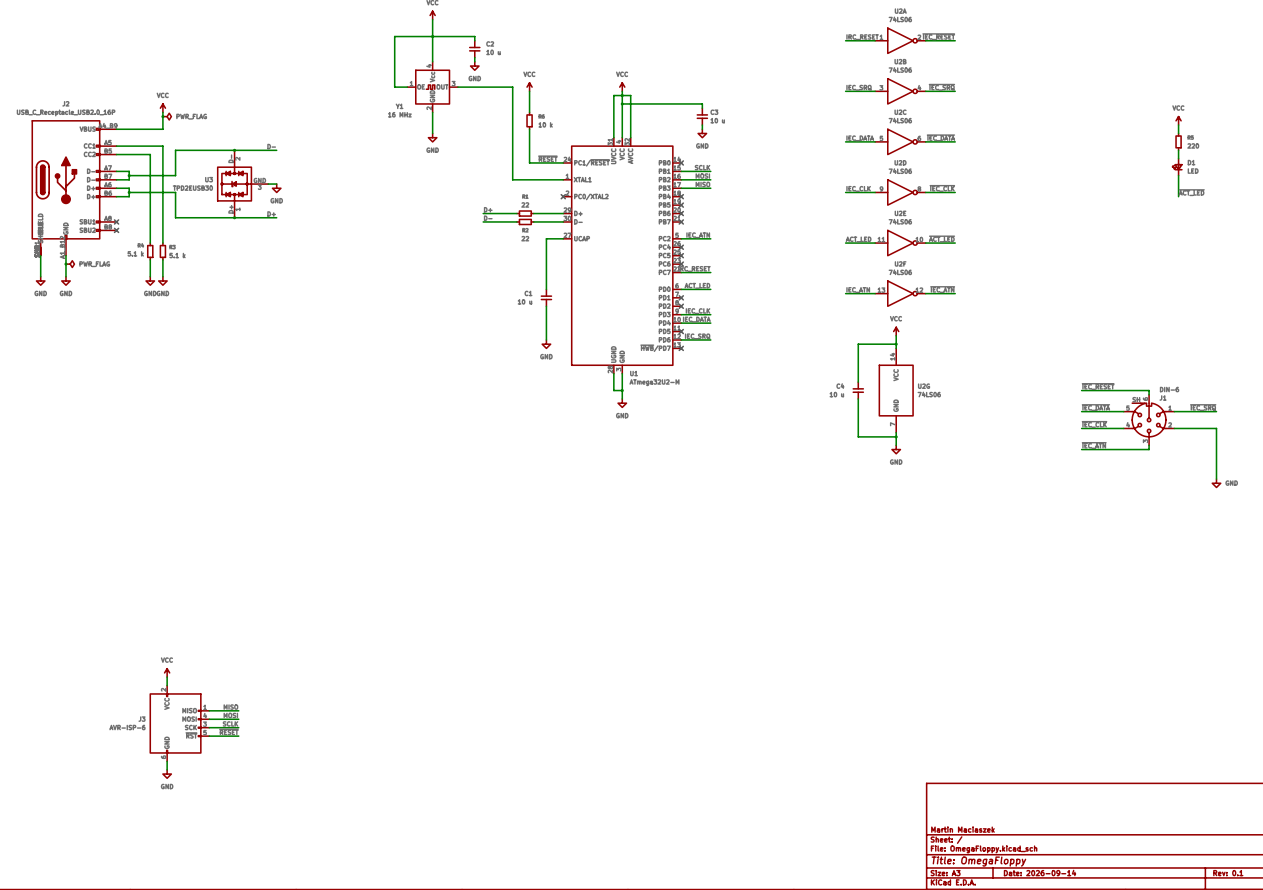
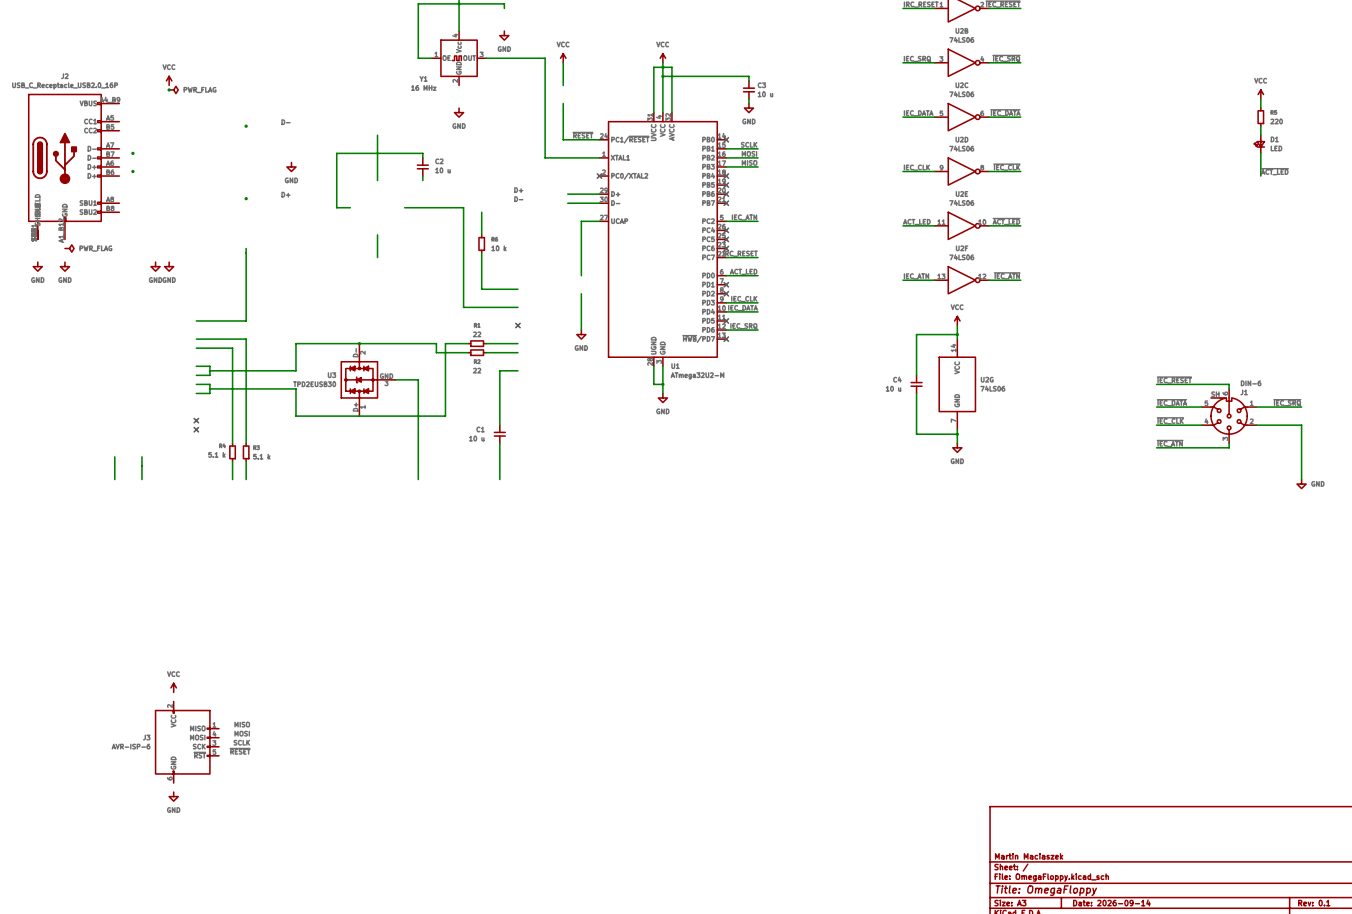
part position: (474, 49) -> (422, 166)
wire: (474, 57) (474, 61) -> none
wire: (162, 112) (162, 129) (116, 129) -> none
wire: (432, 112) (432, 133) -> none
part position: (529, 120) -> (481, 243)
wire: (116, 146) (162, 146) (162, 243) -> none
wire: (276, 150) (175, 150) (175, 175) (129, 175) -> none
wire: (116, 154) (150, 154) (150, 243) -> none
wire: none -> (377, 135) (377, 180)
wire: (116, 171) (129, 171) (129, 179) (116, 179) -> none
wire: none -> (422, 157) (422, 153) (336, 153) (336, 207) (350, 207)
part position: (242, 184) -> (368, 379)
wire: (268, 184) (276, 184) -> none
wire: (116, 188) (129, 188) (129, 196) (116, 196) -> none
wire: (129, 192) (175, 192) (175, 217) (276, 217) -> none
wire: none -> (422, 176) (422, 180)
wire: (483, 213) (516, 213) -> none
part position: (525, 213) -> (477, 343)
no-connect mark: (116, 221) -> none
wire: (483, 221) (516, 221) -> none
part position: (525, 221) -> (477, 352)
wire: none -> (404, 207) (463, 207) (463, 307) (517, 307)
no-connect mark: (116, 230) -> none
wire: none -> (481, 212) (481, 234)
part position: (150, 251) -> (232, 452)
part position: (162, 251) -> (246, 452)
wire: none -> (377, 234) (377, 257)
wire: (40, 255) (40, 276) -> none
wire: (65, 255) (65, 276) -> none
wire: (150, 259) (150, 276) -> none
wire: (162, 259) (162, 276) -> none
wire: none -> (246, 248) (246, 320) (196, 320)
wire: none -> (481, 253) (481, 289) (517, 289)
part position: (546, 297) -> (499, 434)
no-connect mark: none -> (517, 325)
wire: none -> (196, 339) (246, 339) (246, 443)
junction: none -> (359, 343)
wire: none -> (468, 343) (445, 343) (445, 416) (295, 416) (295, 388) (209, 388)
wire: none -> (486, 343) (517, 343)
wire: none -> (196, 348) (232, 348) (232, 443)
wire: none -> (468, 352) (436, 352) (436, 343) (295, 343) (295, 370) (209, 370)
wire: none -> (486, 352) (517, 352)
wire: none -> (196, 366) (209, 366) (209, 375) (196, 375)
wire: none -> (517, 370) (499, 370) (499, 425)
wire: none -> (395, 379) (418, 379) (418, 479)
wire: none -> (196, 384) (209, 384) (209, 393) (196, 393)
no-connect mark: none -> (196, 420)
no-connect mark: none -> (196, 429)
wire: none -> (499, 443) (499, 479)
wire: none -> (114, 456) (114, 479)
wire: none -> (141, 456) (141, 479)
wire: none -> (232, 461) (232, 479)
wire: none -> (246, 461) (246, 479)
wire: (167, 677) (167, 685) -> none
wire: (209, 710) (238, 710) -> none
wire: (209, 719) (238, 719) -> none
wire: (209, 727) (238, 727) -> none
wire: (209, 736) (238, 736) -> none
wire: (167, 761) (167, 769) -> none

